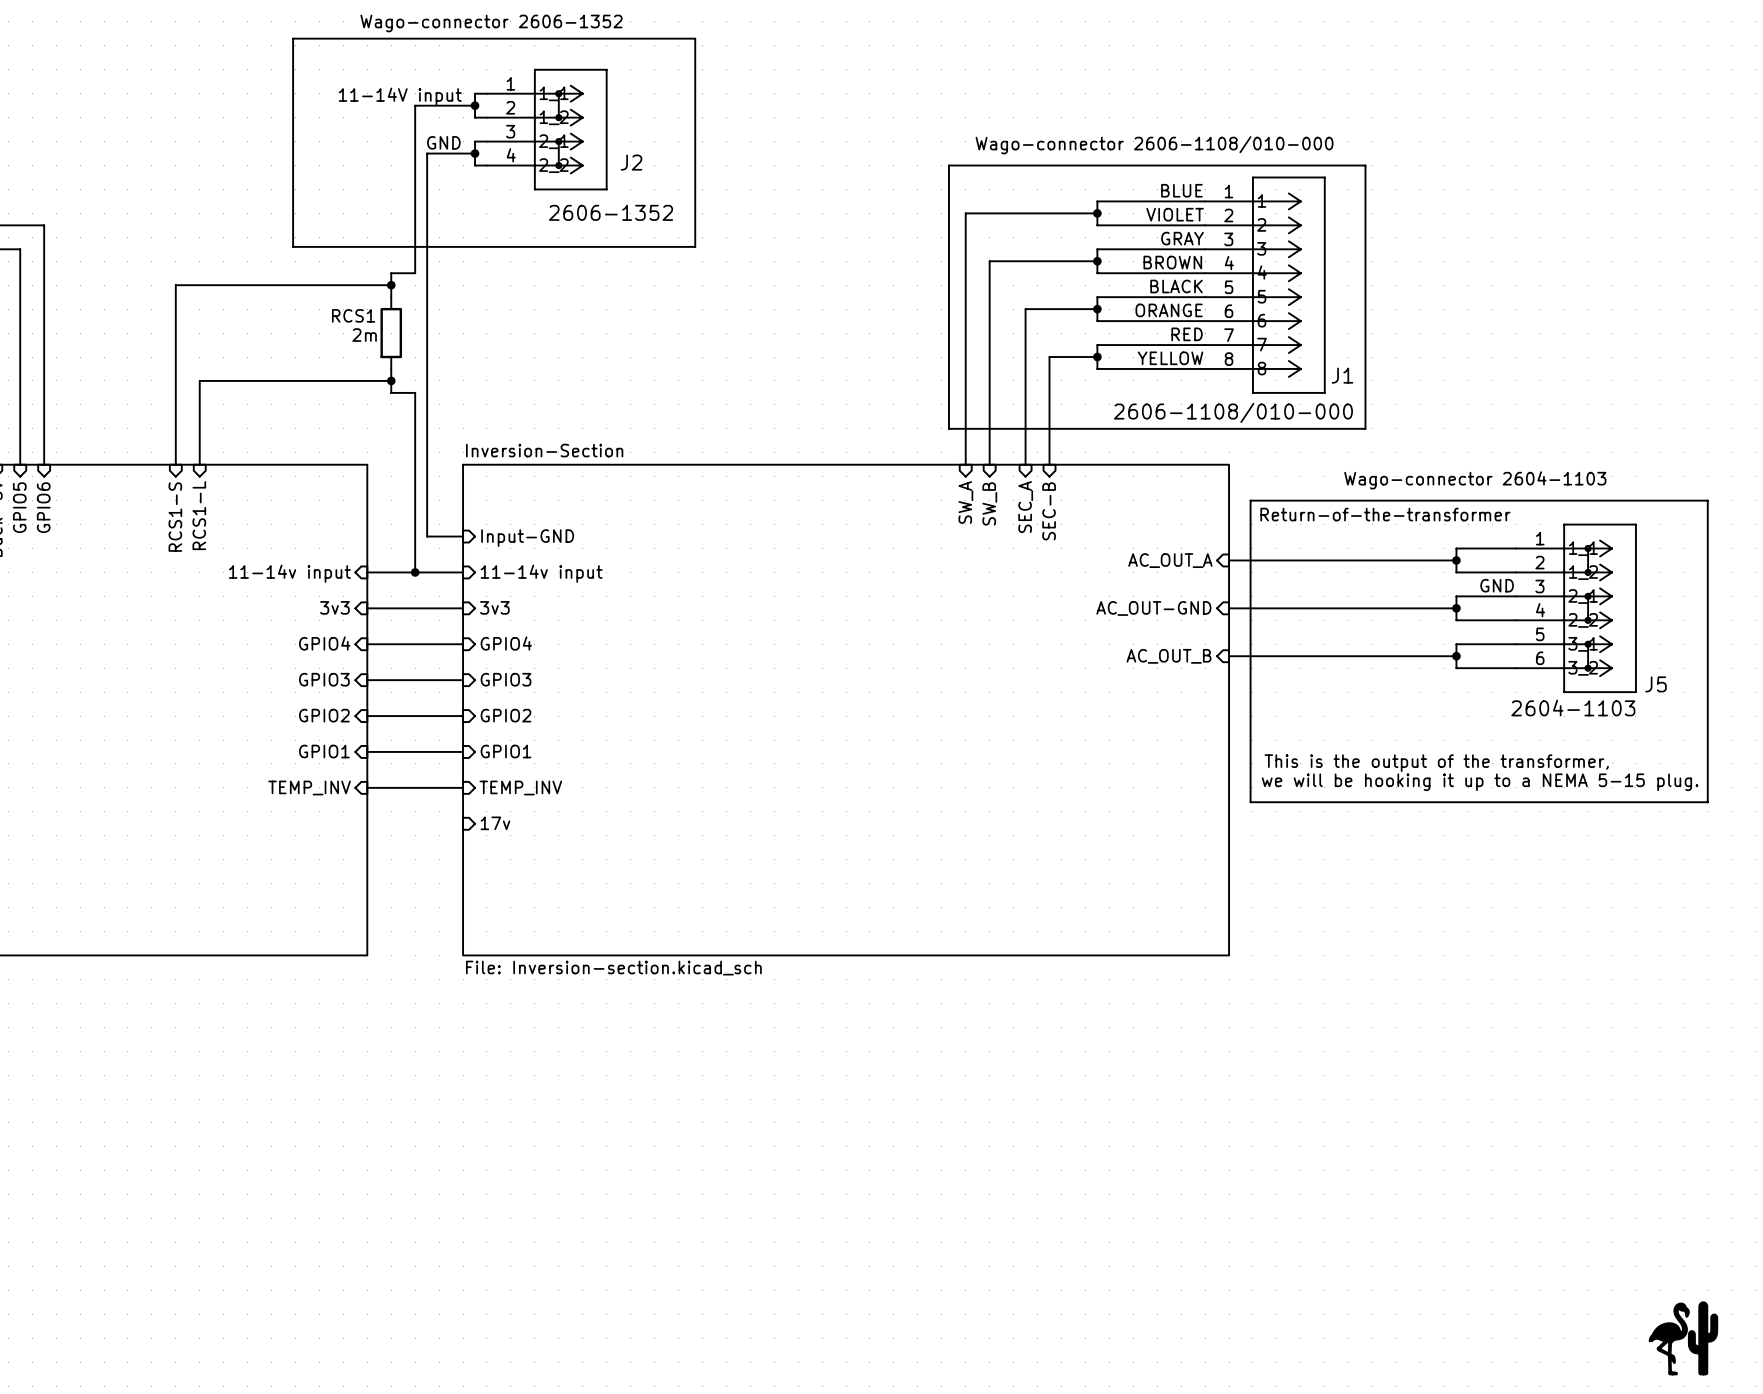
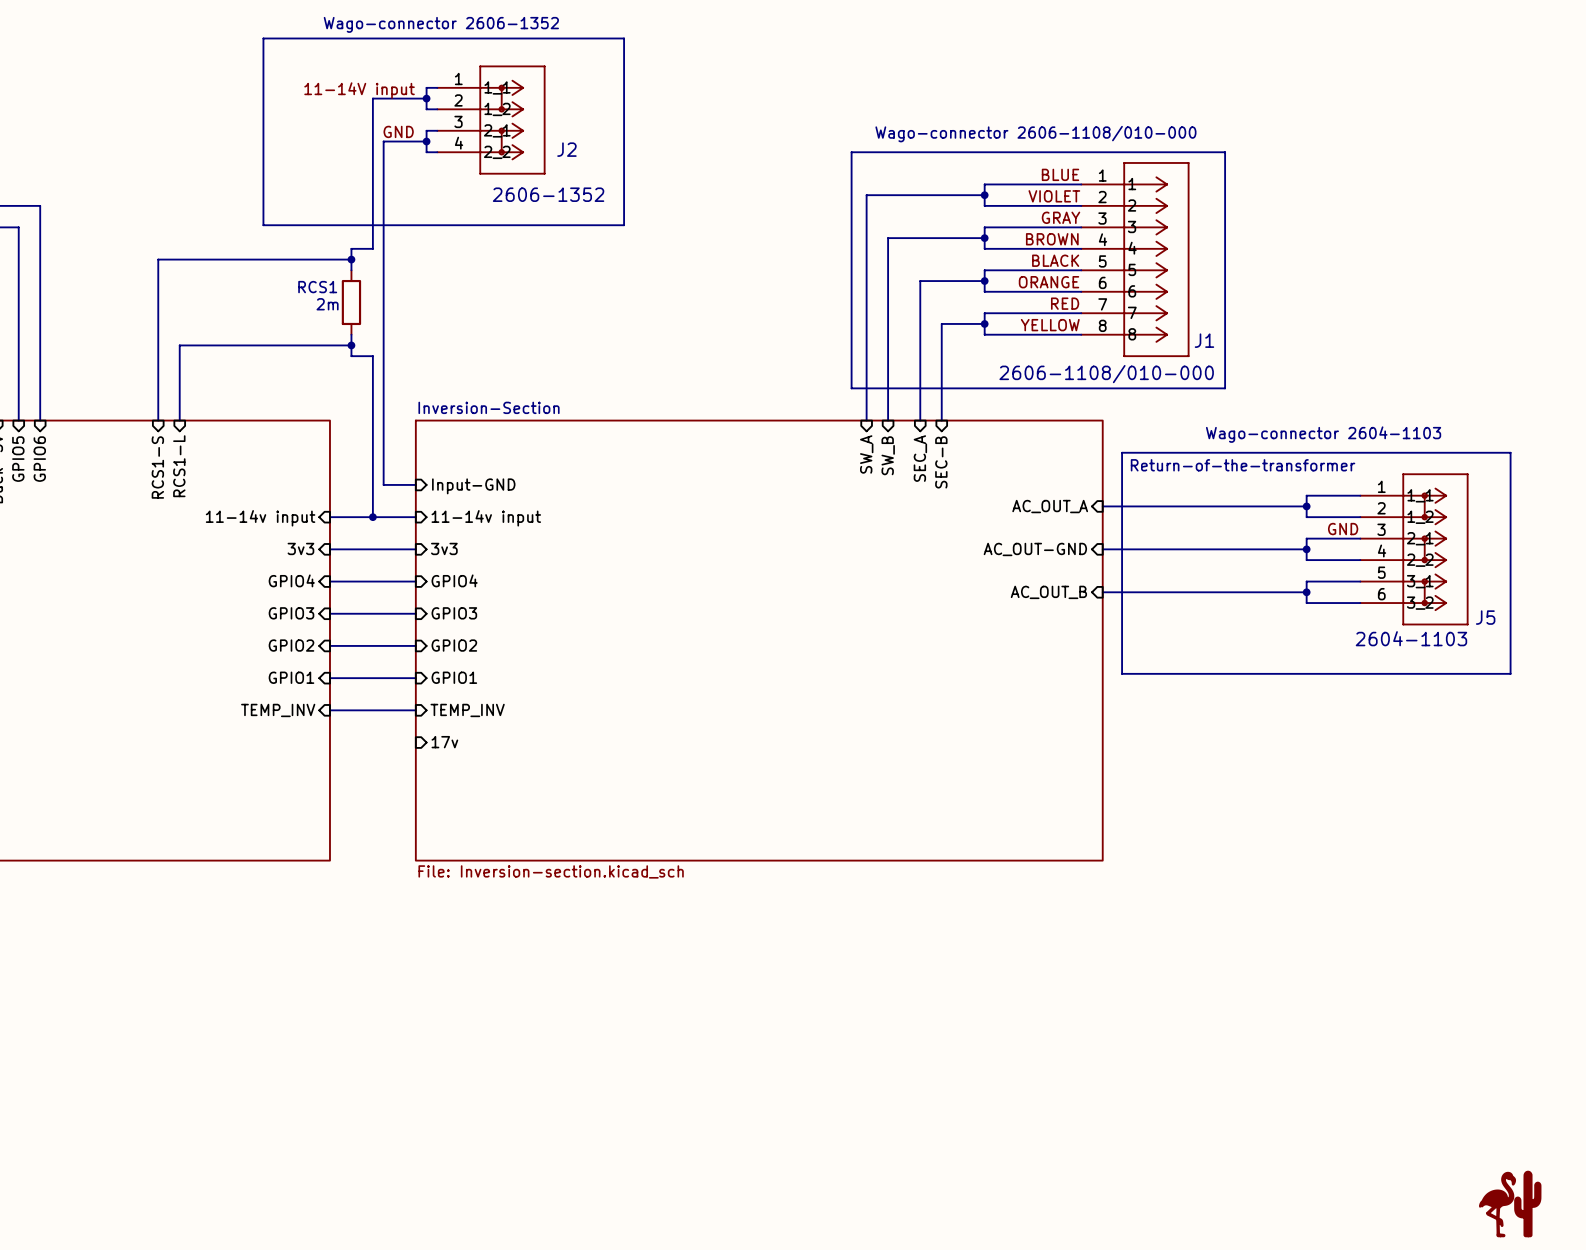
line: (1683, 500) (1707, 500) (1707, 802) (1250, 802) (1250, 747) -> (1510, 452) (1510, 673) (1122, 673)
text: This is the output of the transformer, (1436, 763) -> none
text: we will be hooking it up to a NEMA 5-15 plug. (1480, 782) -> none

